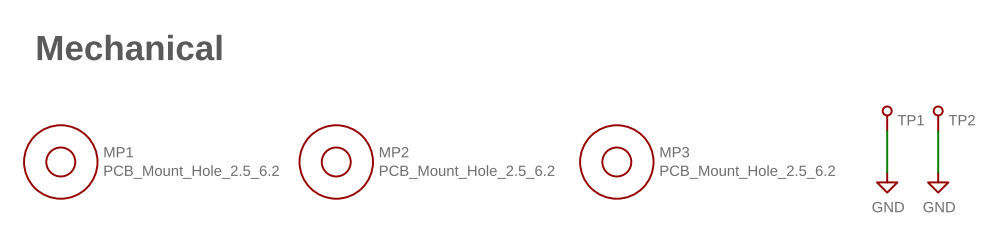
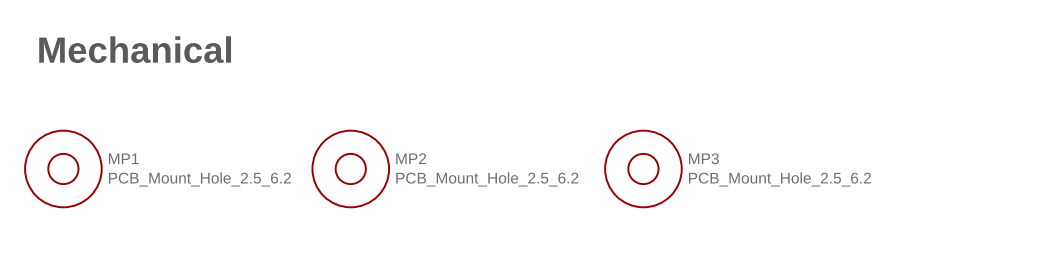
TP1: (887, 118) -> none
TP2: (938, 118) -> none
wire: (887, 131) (887, 172) -> none
wire: (938, 131) (938, 172) -> none
power symbol: GND (887, 182) -> none
power symbol: GND (938, 182) -> none

